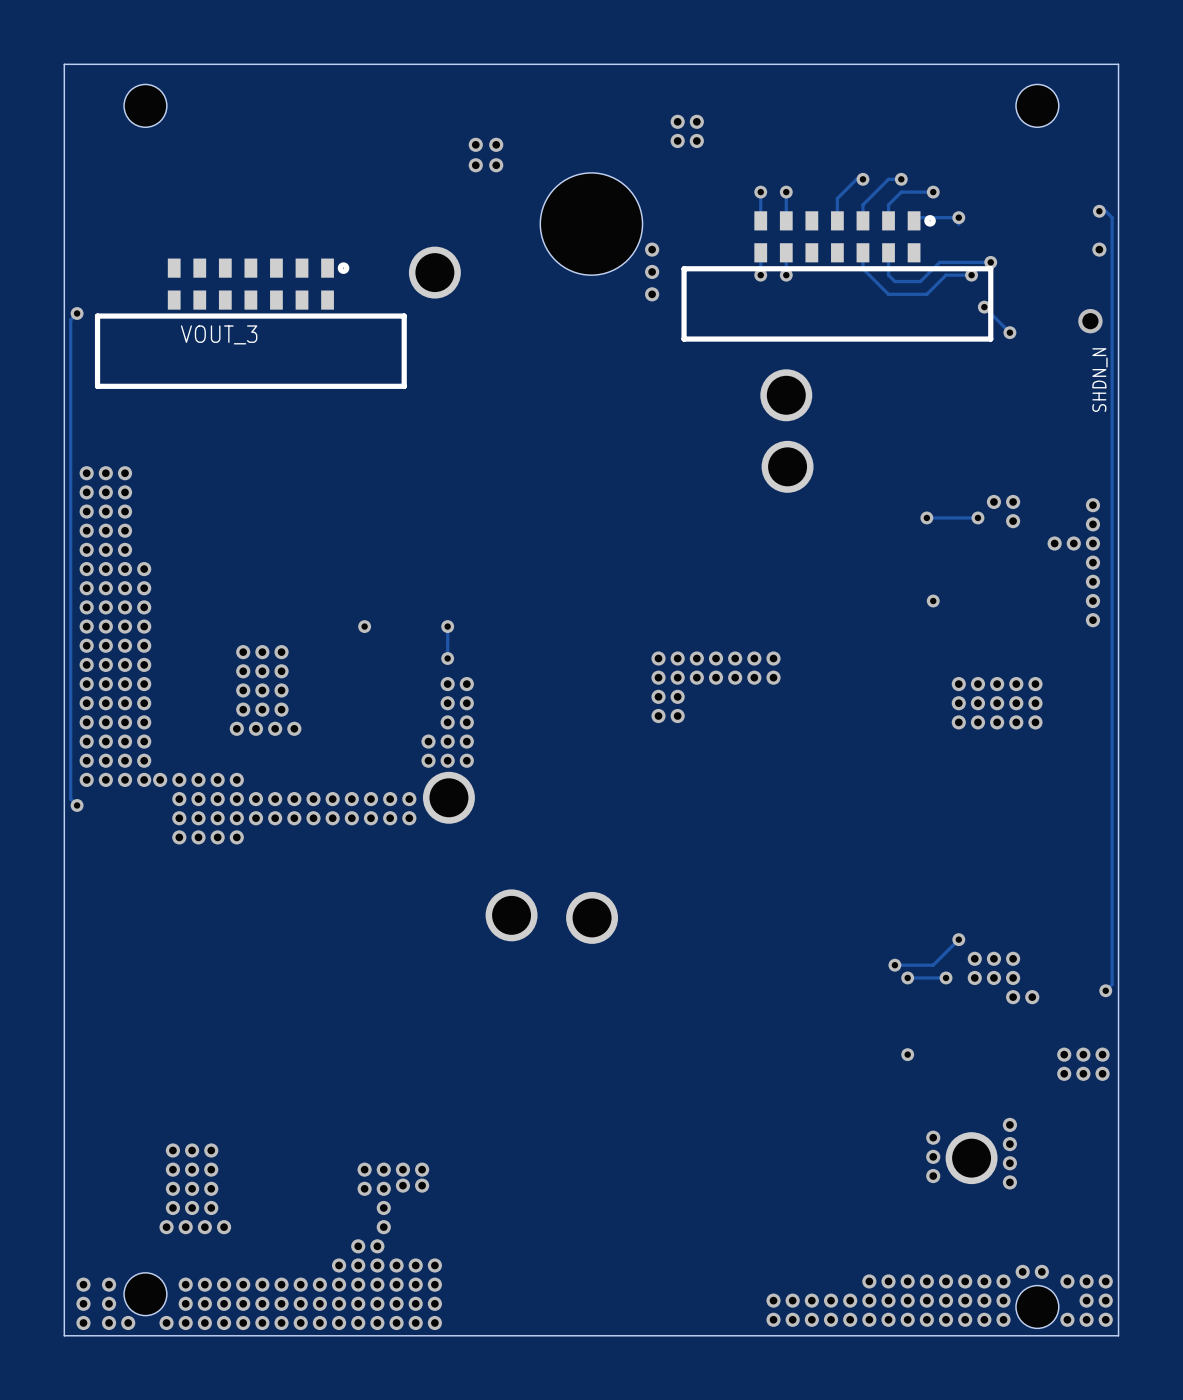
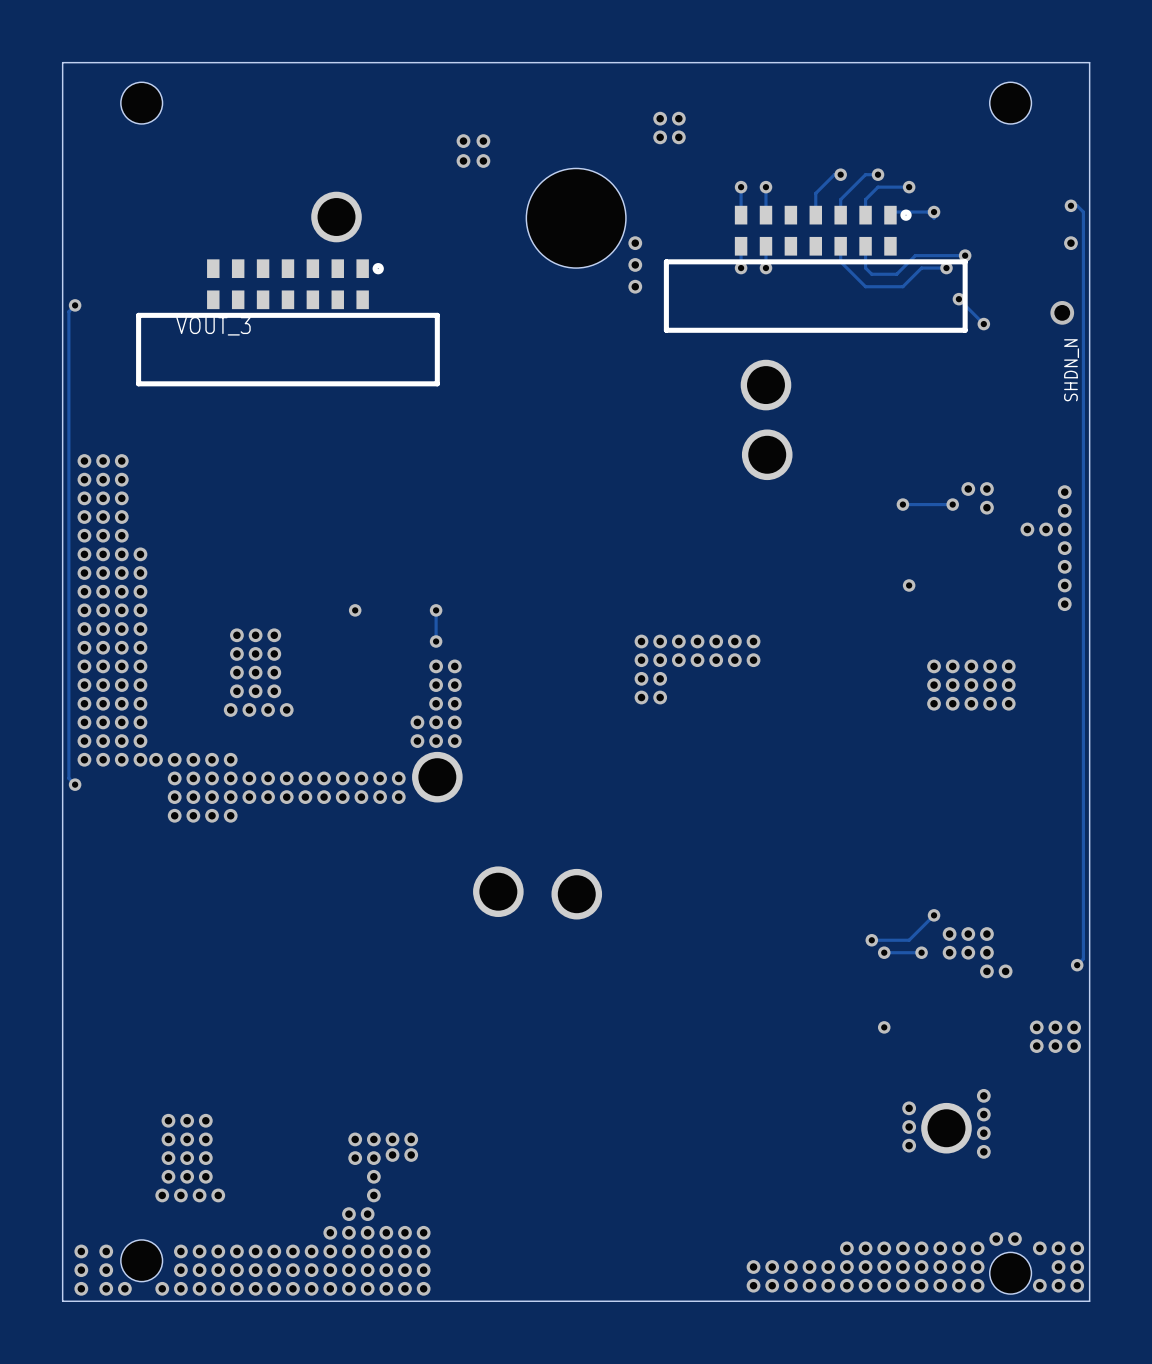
part position: (434, 272) -> (336, 217)
part position: (250, 323) -> (287, 322)

